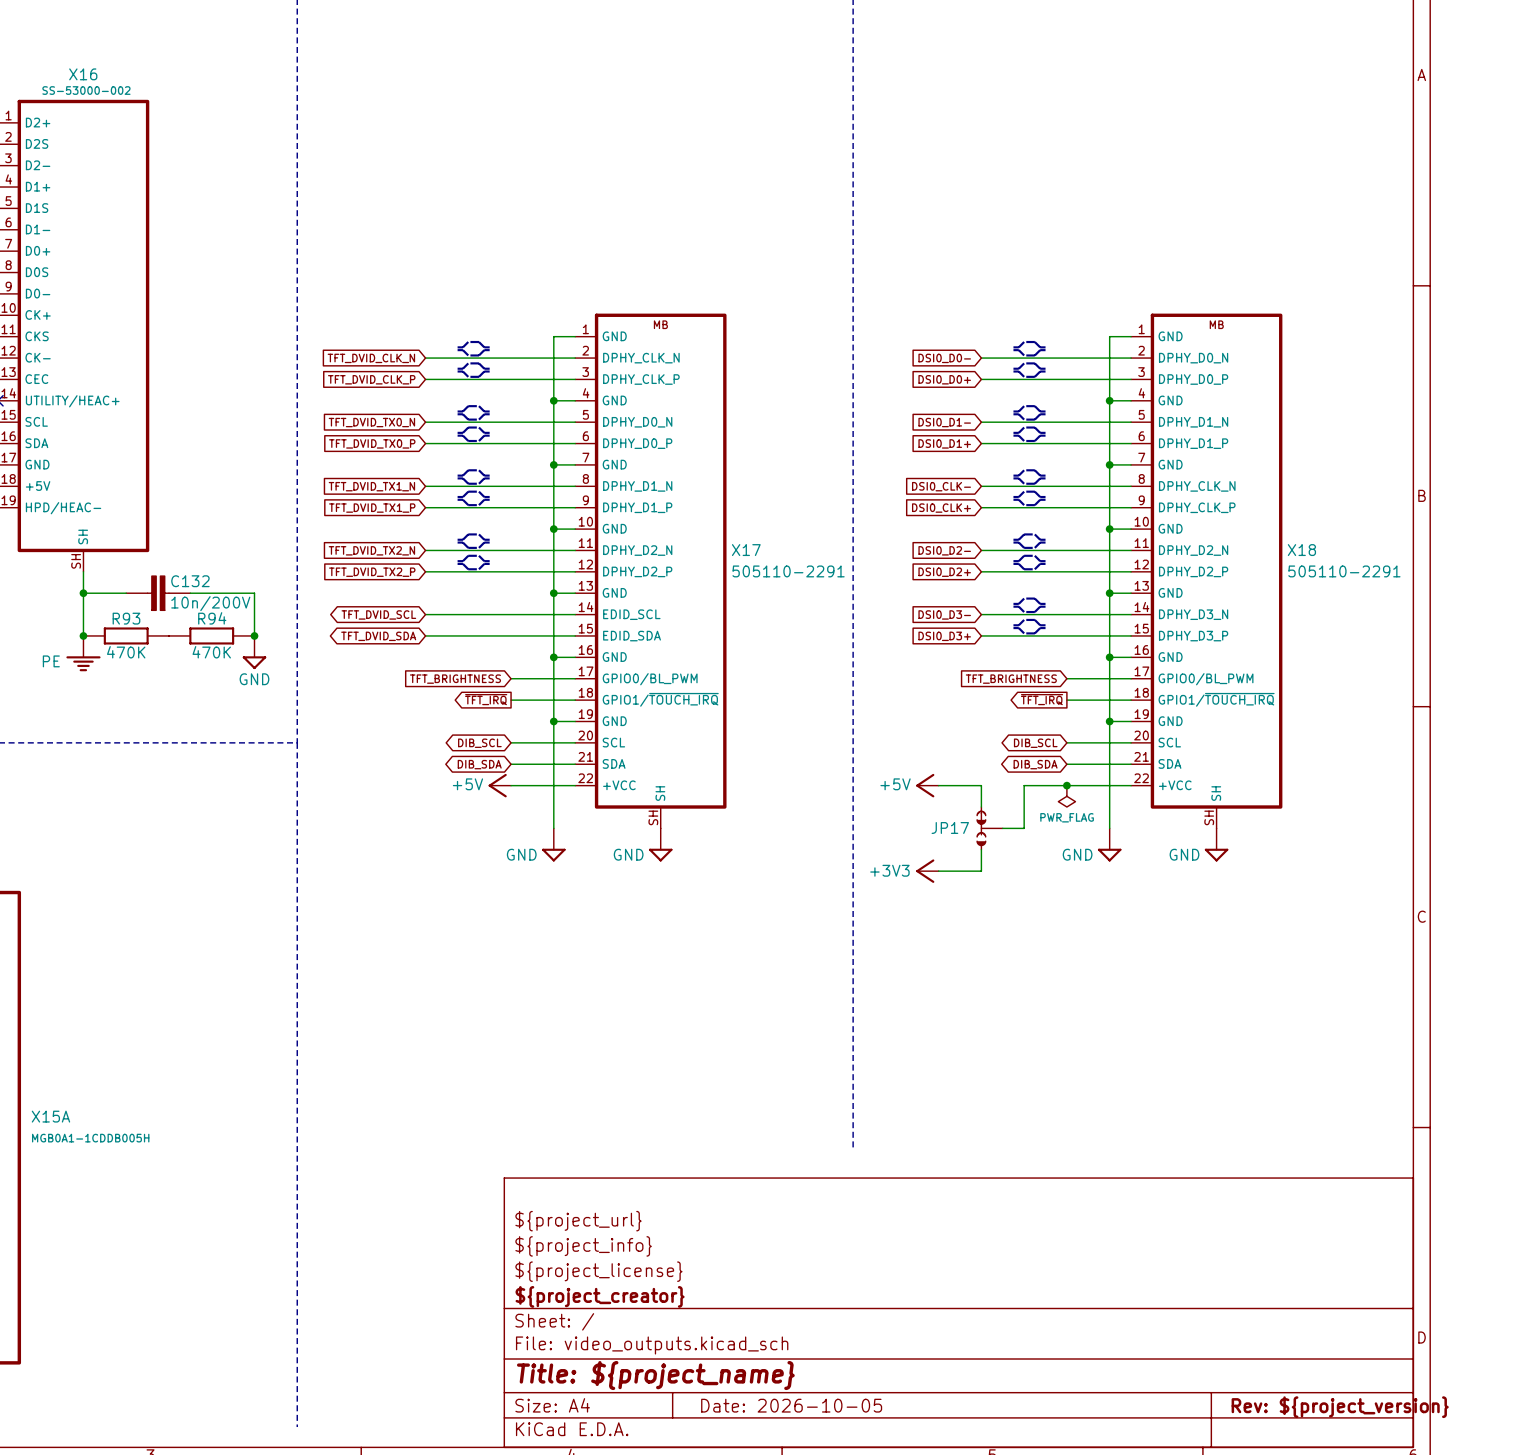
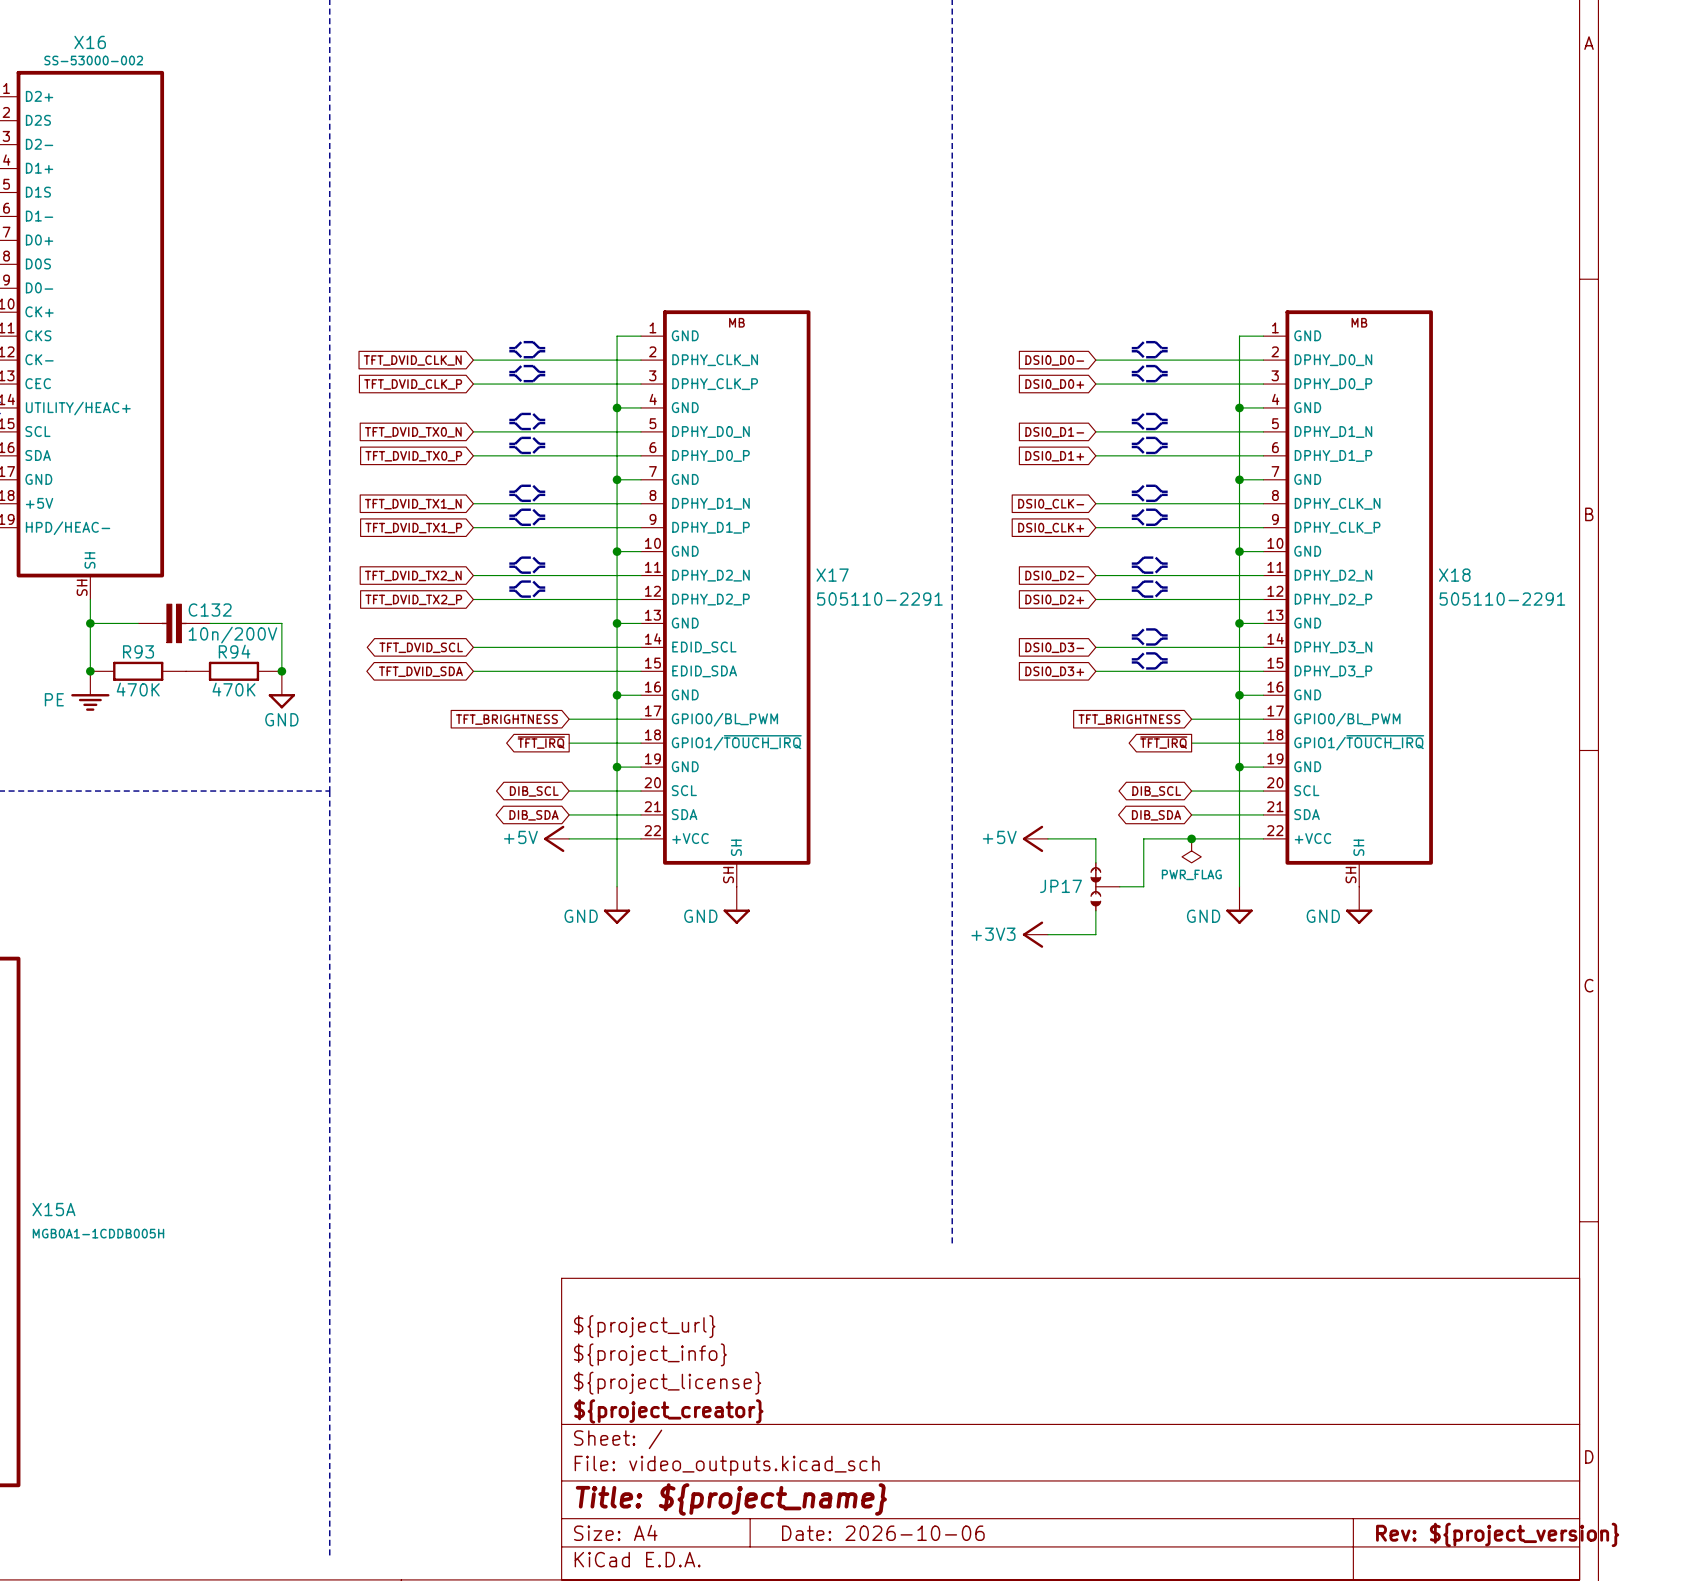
title block: Date: 2026-10-05 (791, 1405) -> Date: 2026-10-06 (883, 1533)

